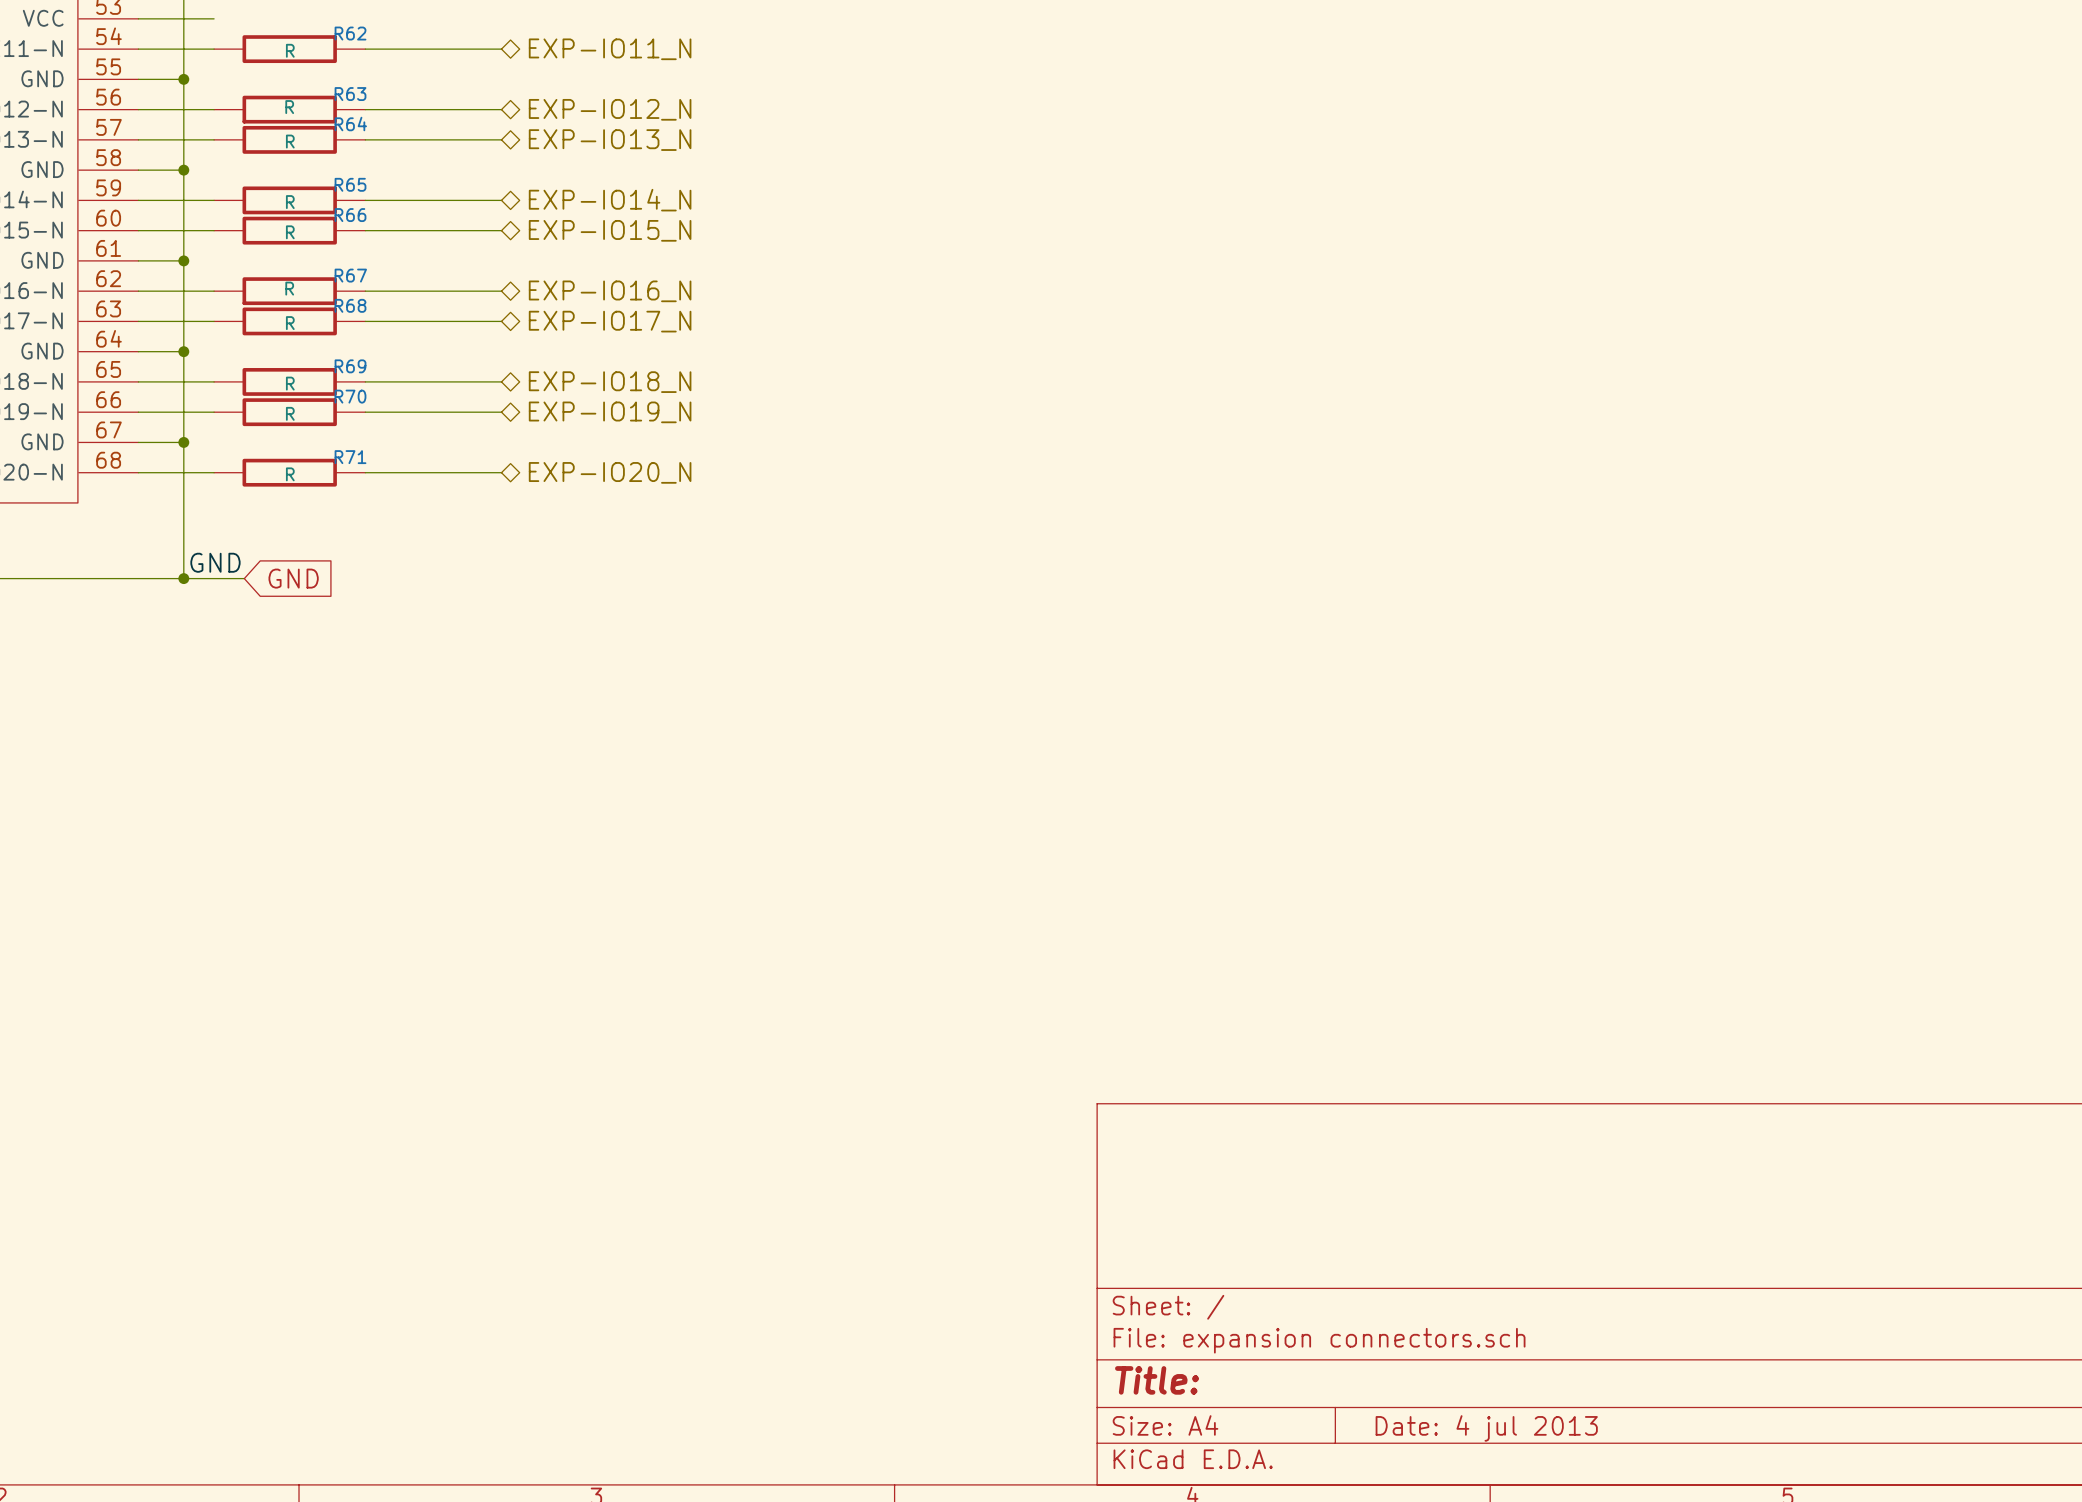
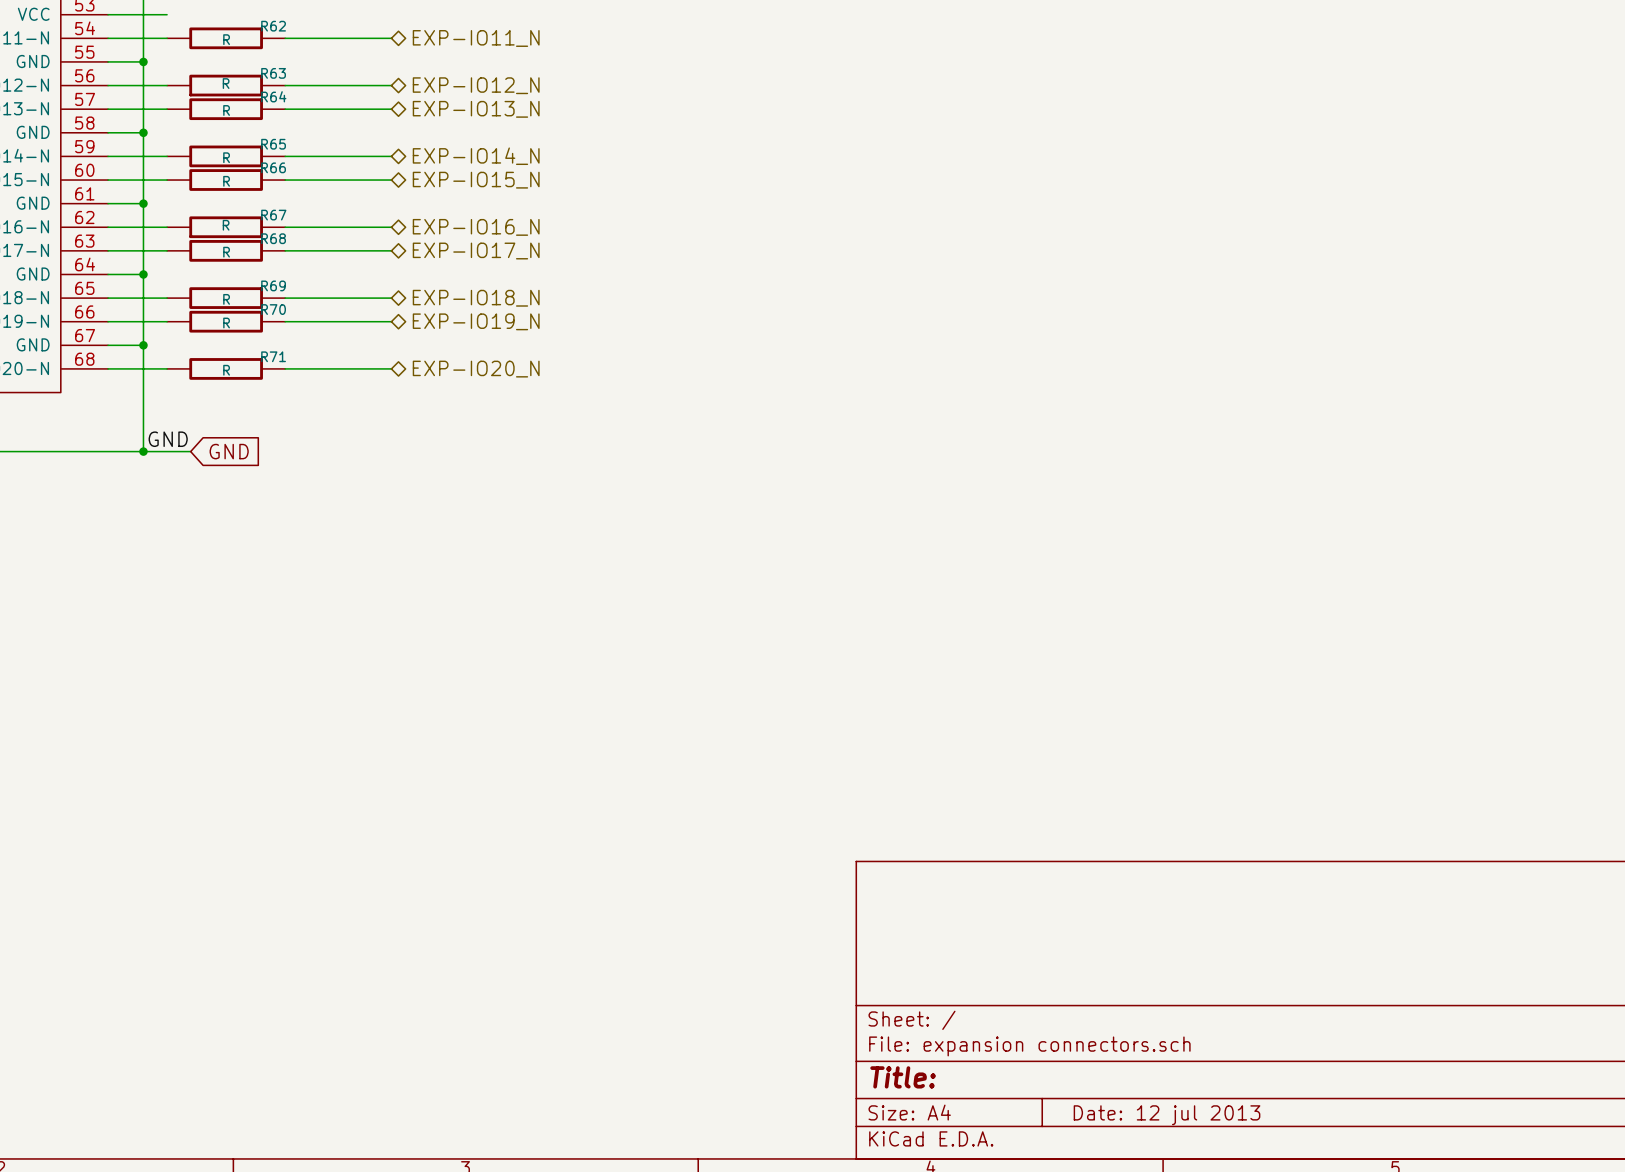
title block: Date: 4 jul 2013 (1486, 1428) -> Date: 12 jul 2013 (1167, 1115)

